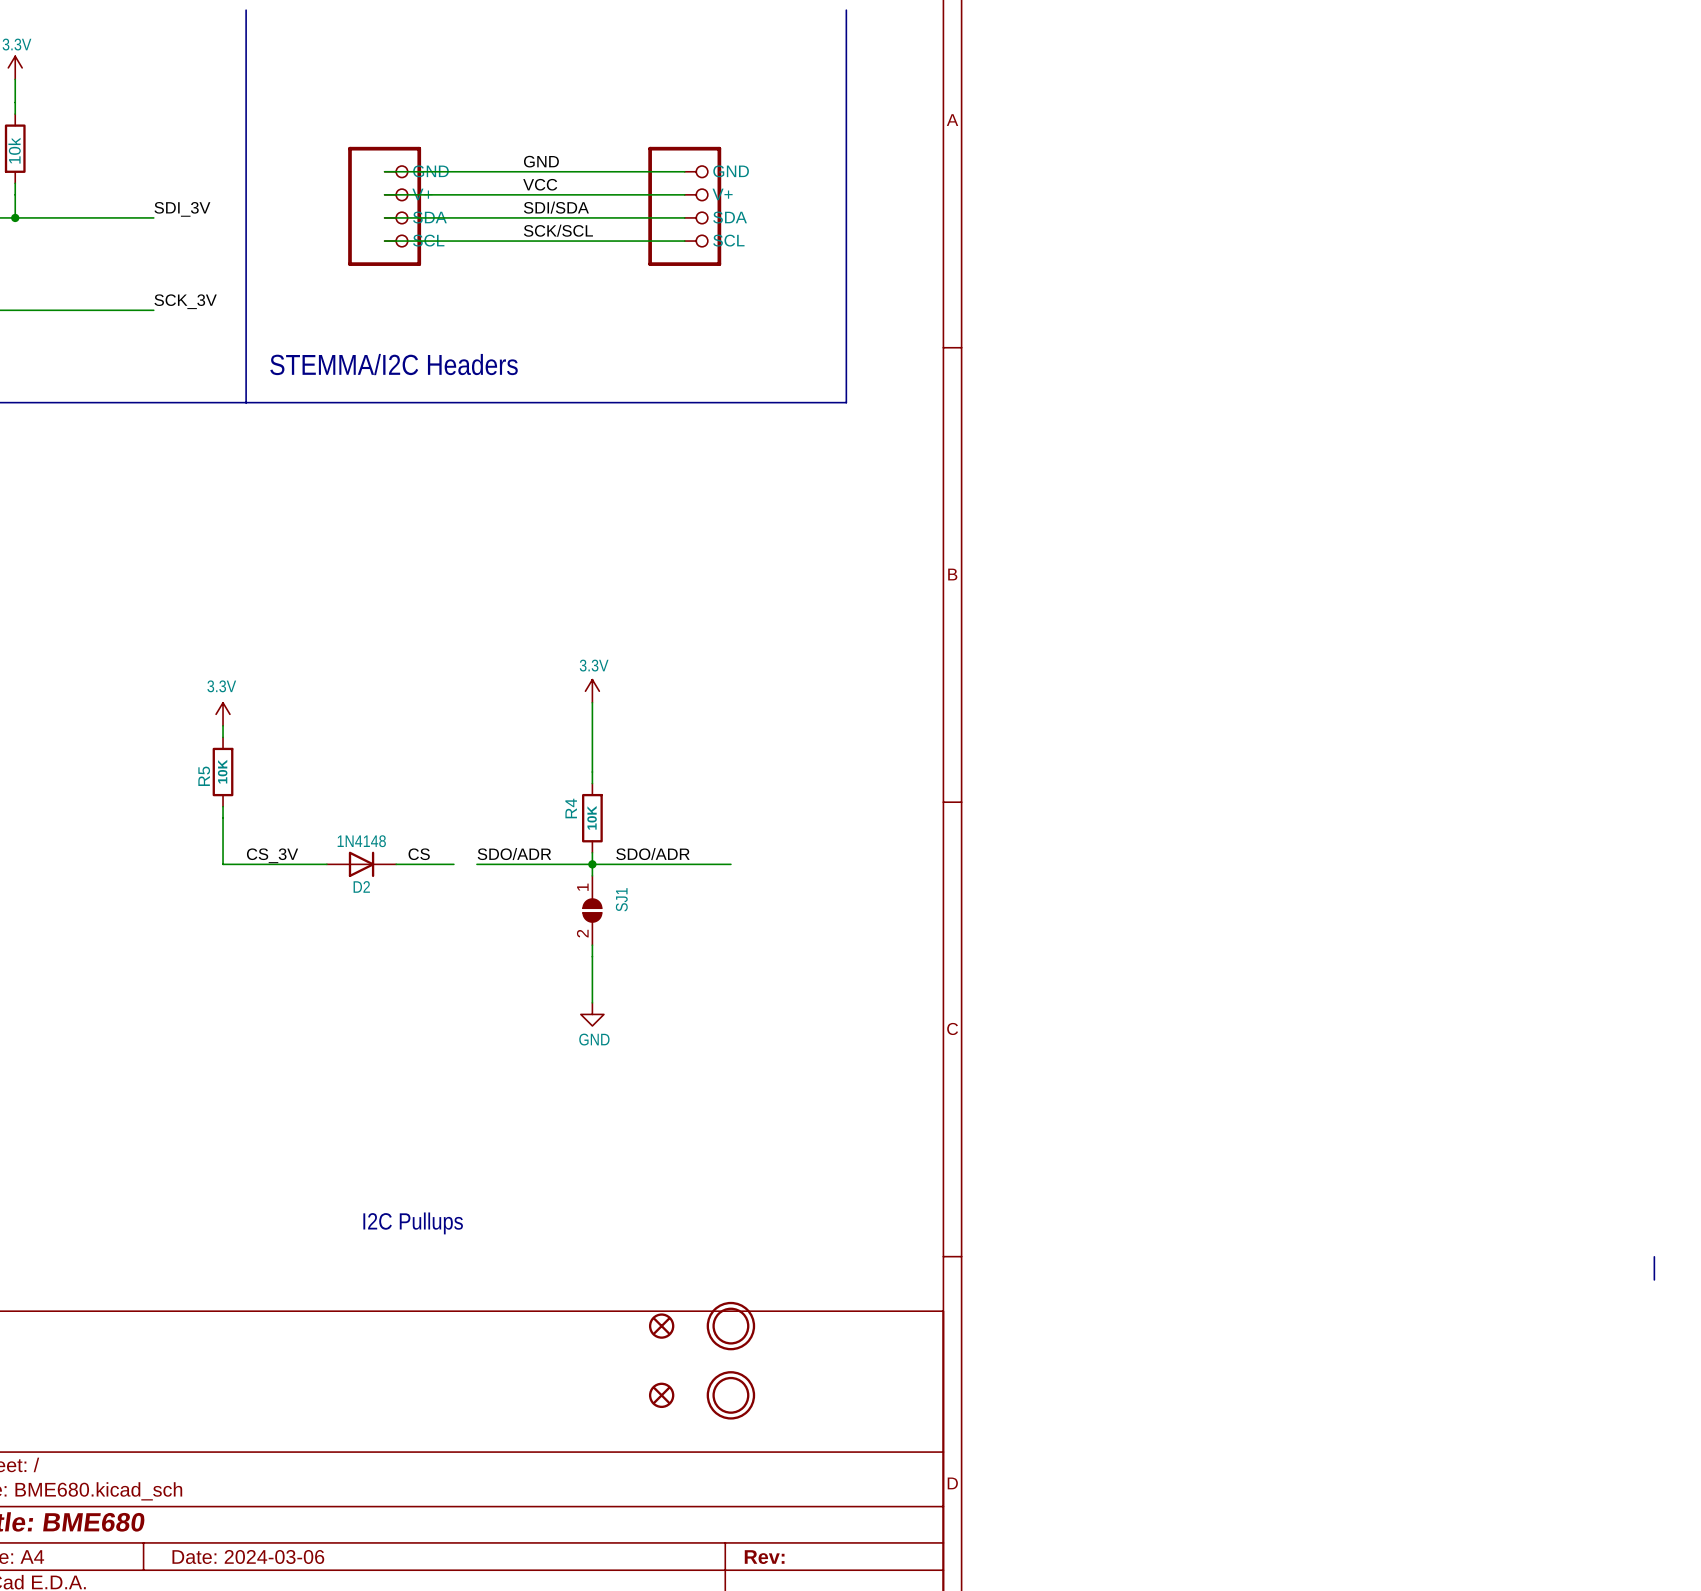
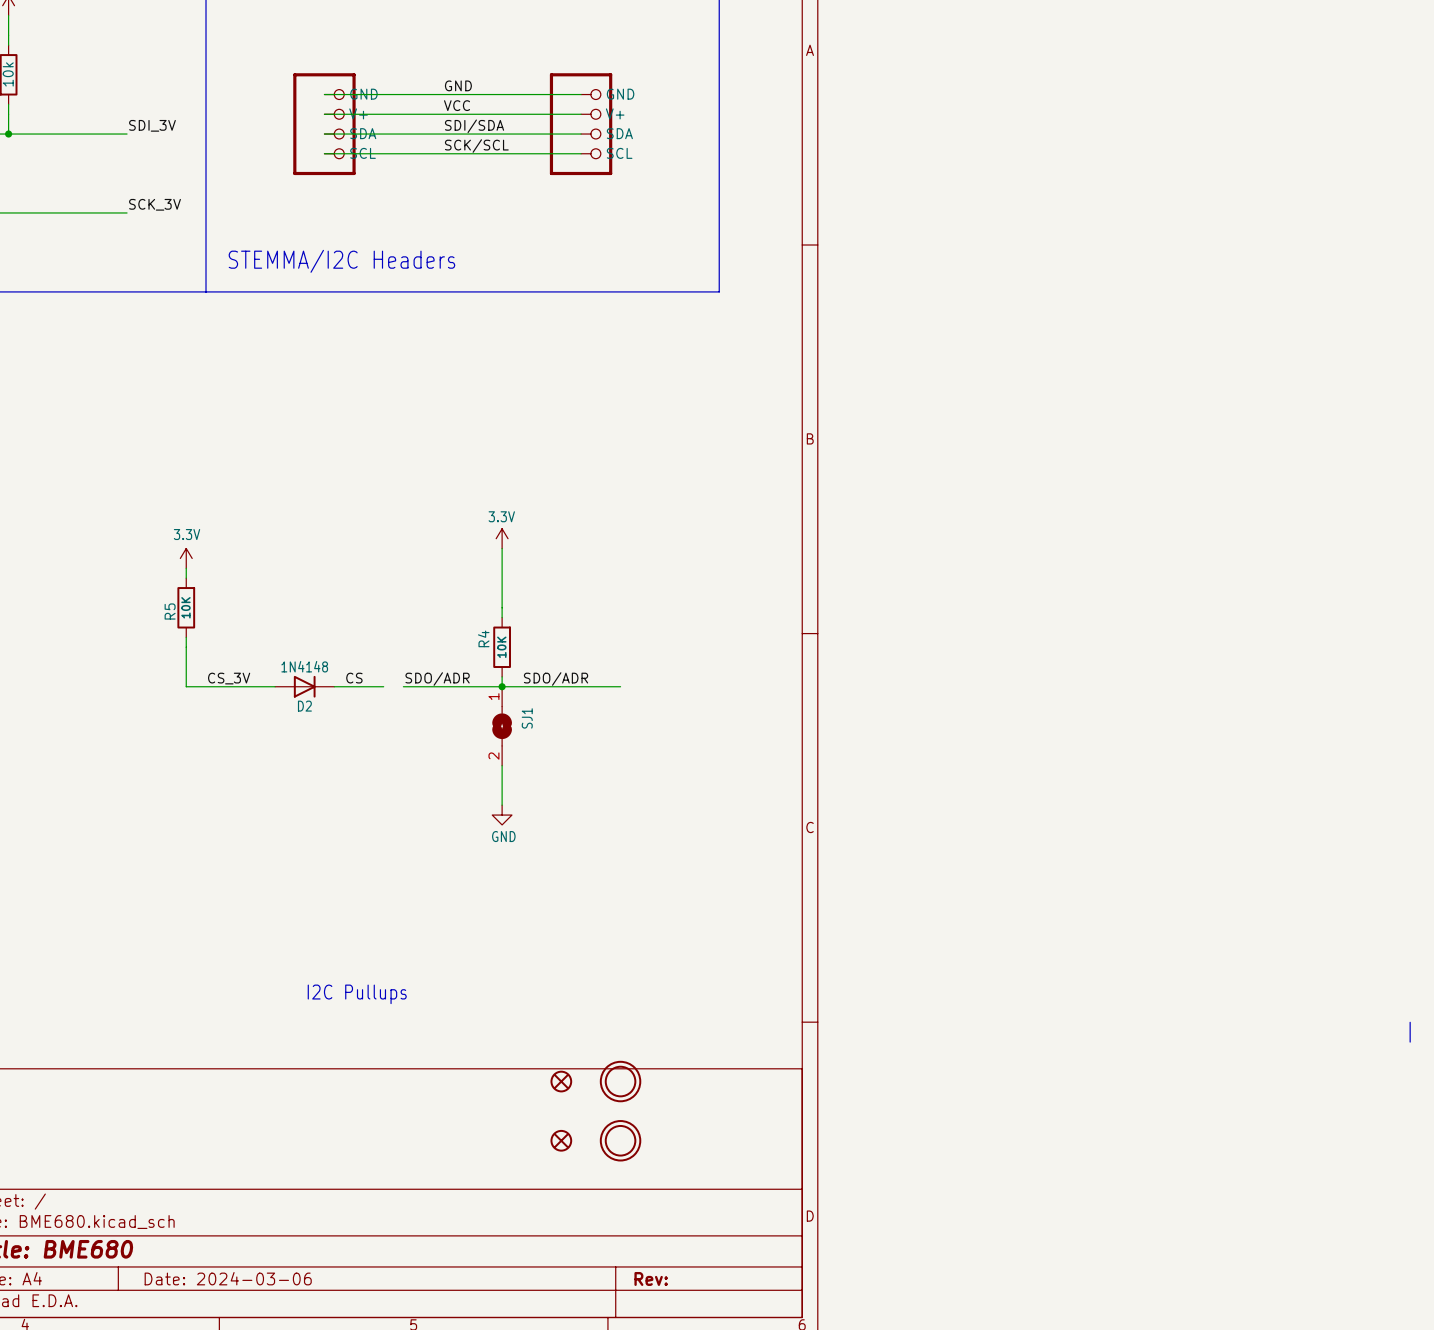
SJ1 symbol: [583, 875, 602, 946] -> [492, 686, 512, 766]

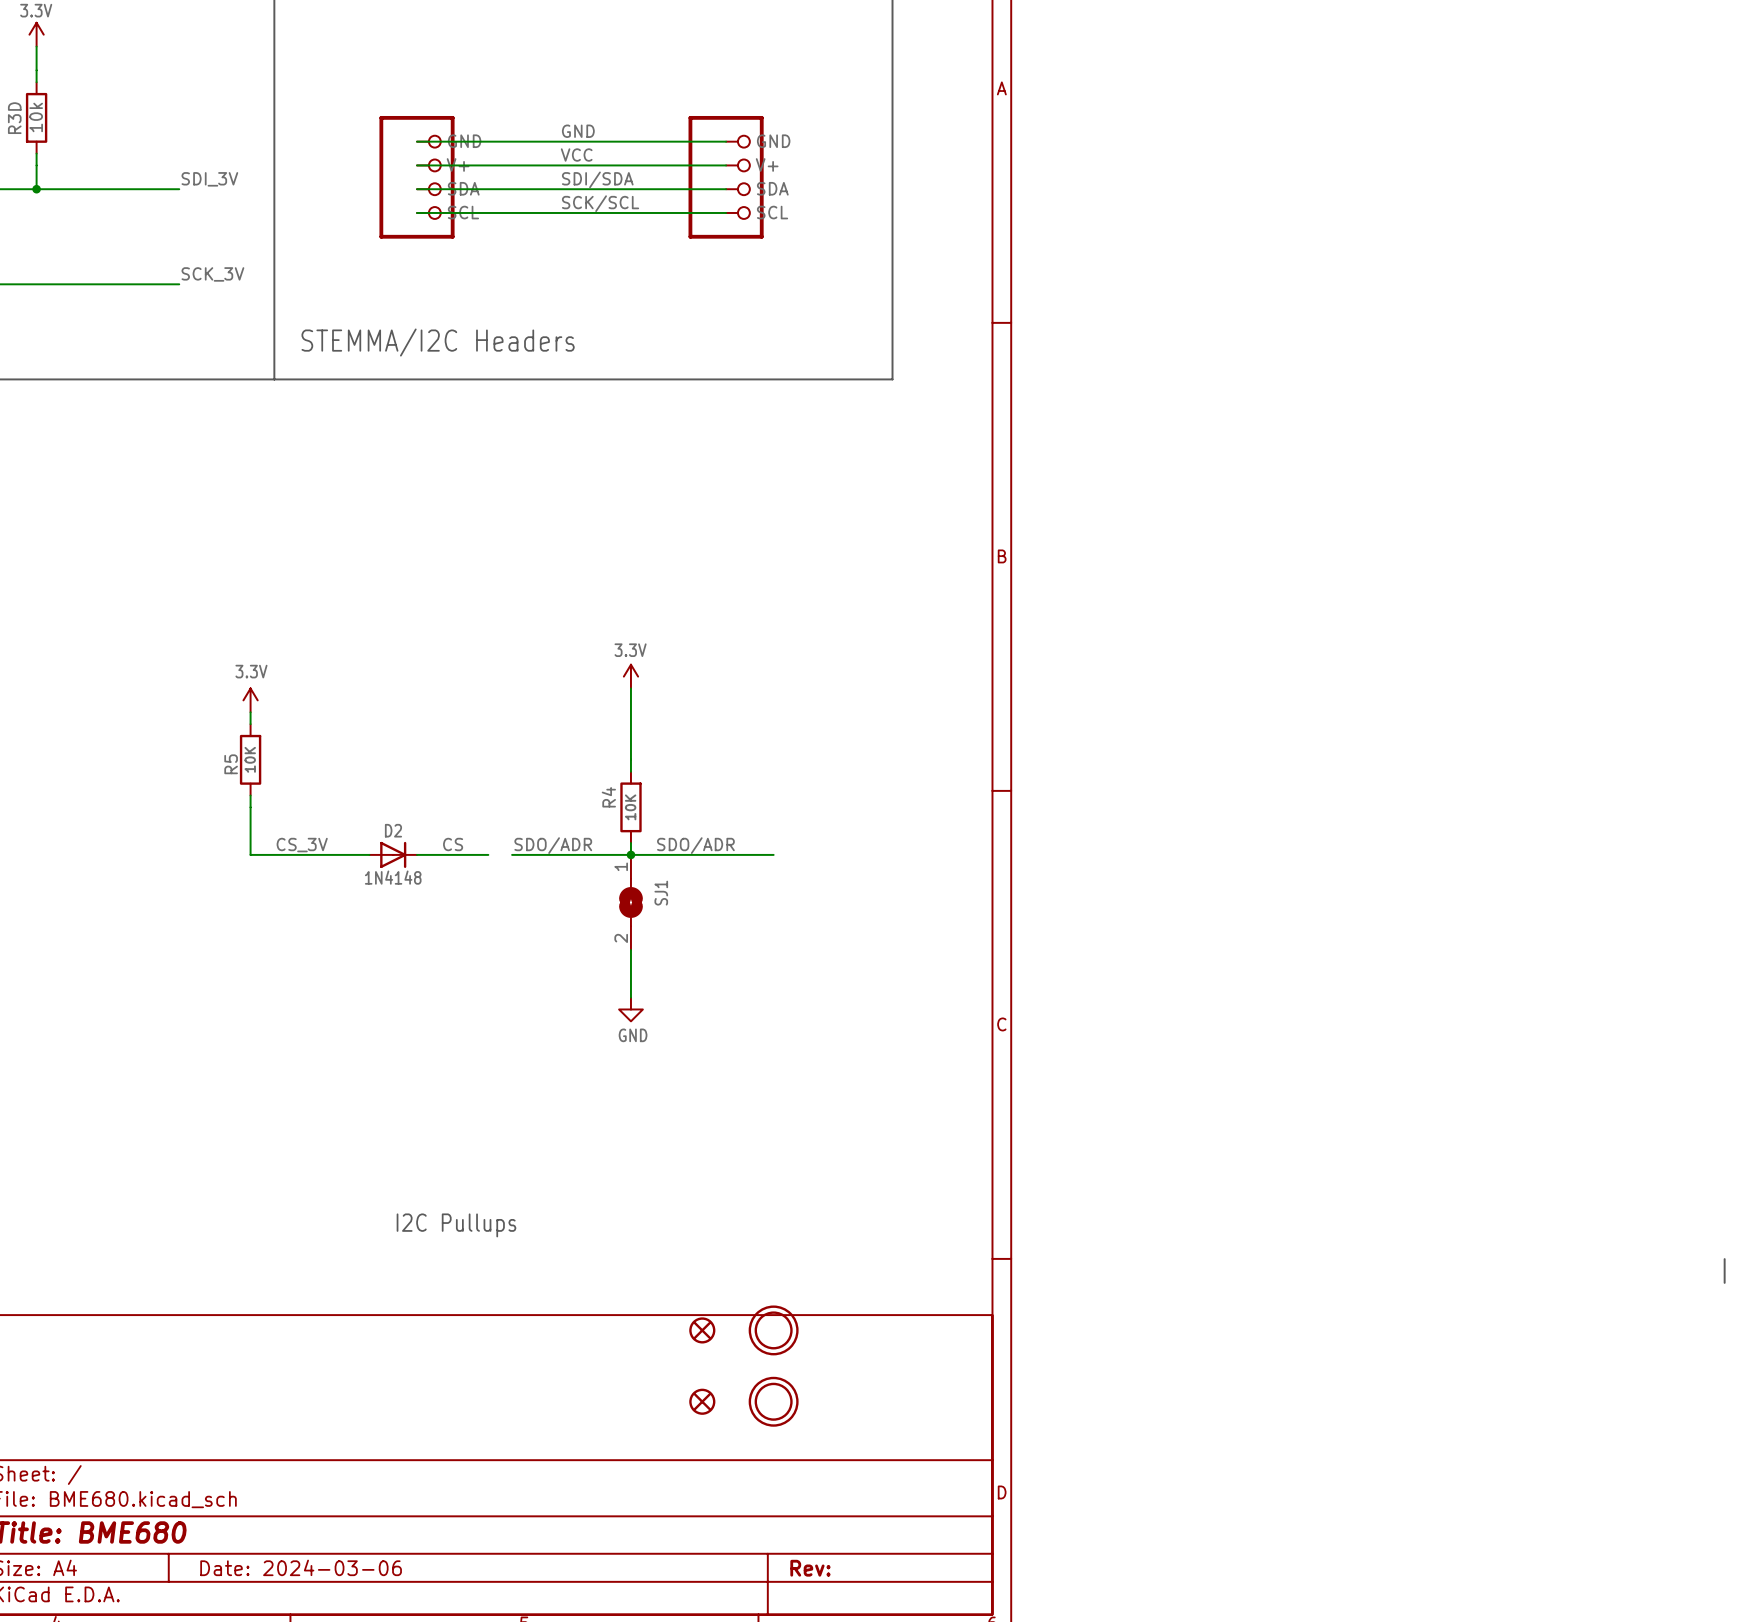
D2 value position: 1N4148 (304, 666) -> 1N4148 (393, 877)
D2 symbol: [275, 675, 335, 698] -> [369, 841, 418, 869]
D2 name position: D2 (304, 706) -> D2 (393, 830)

